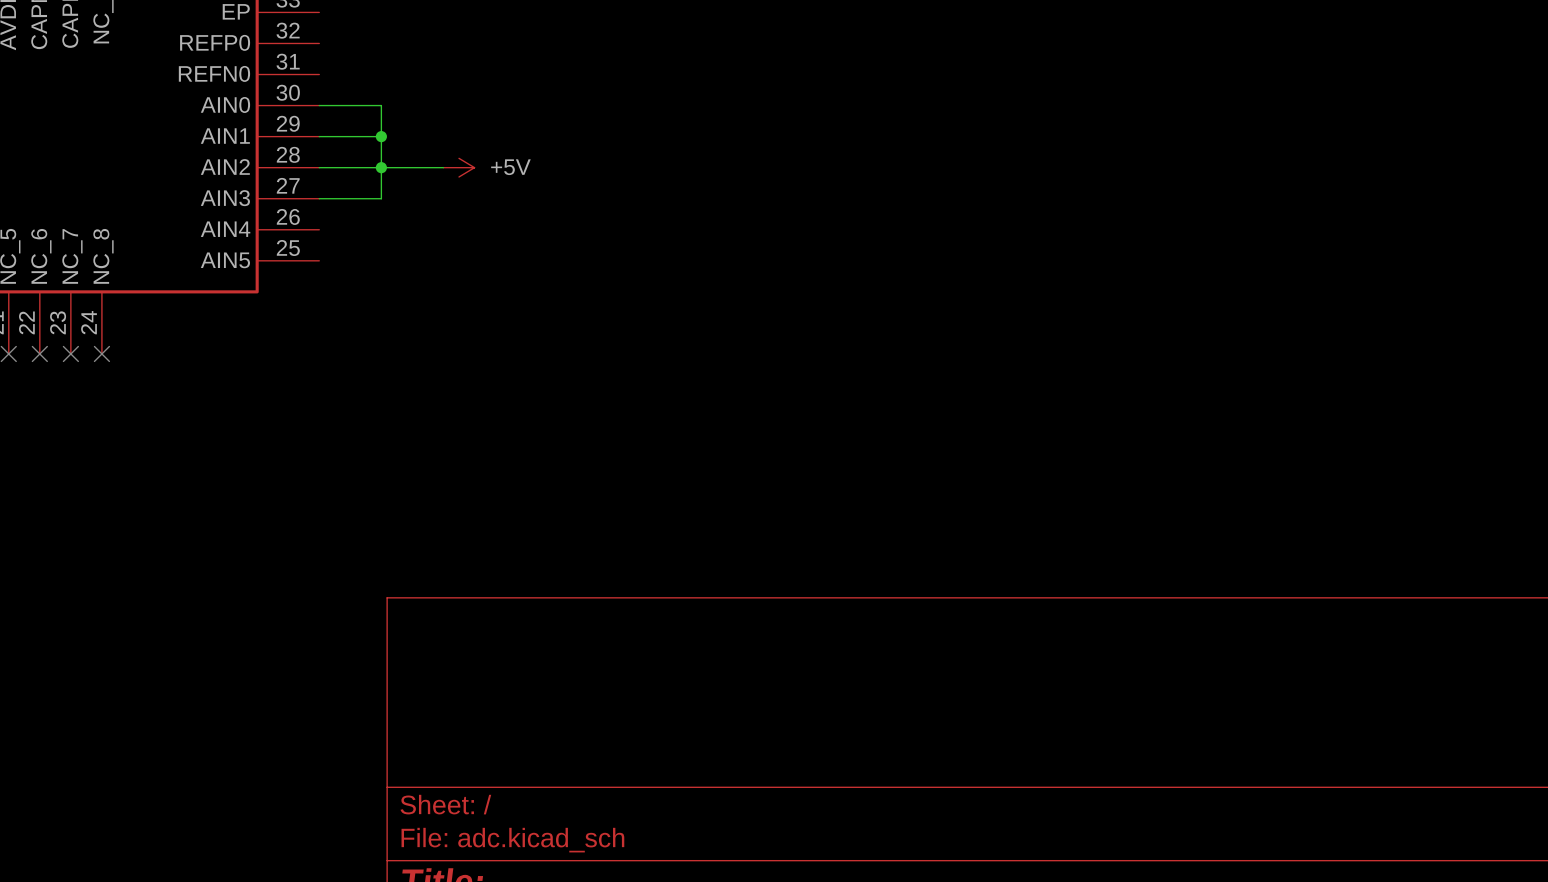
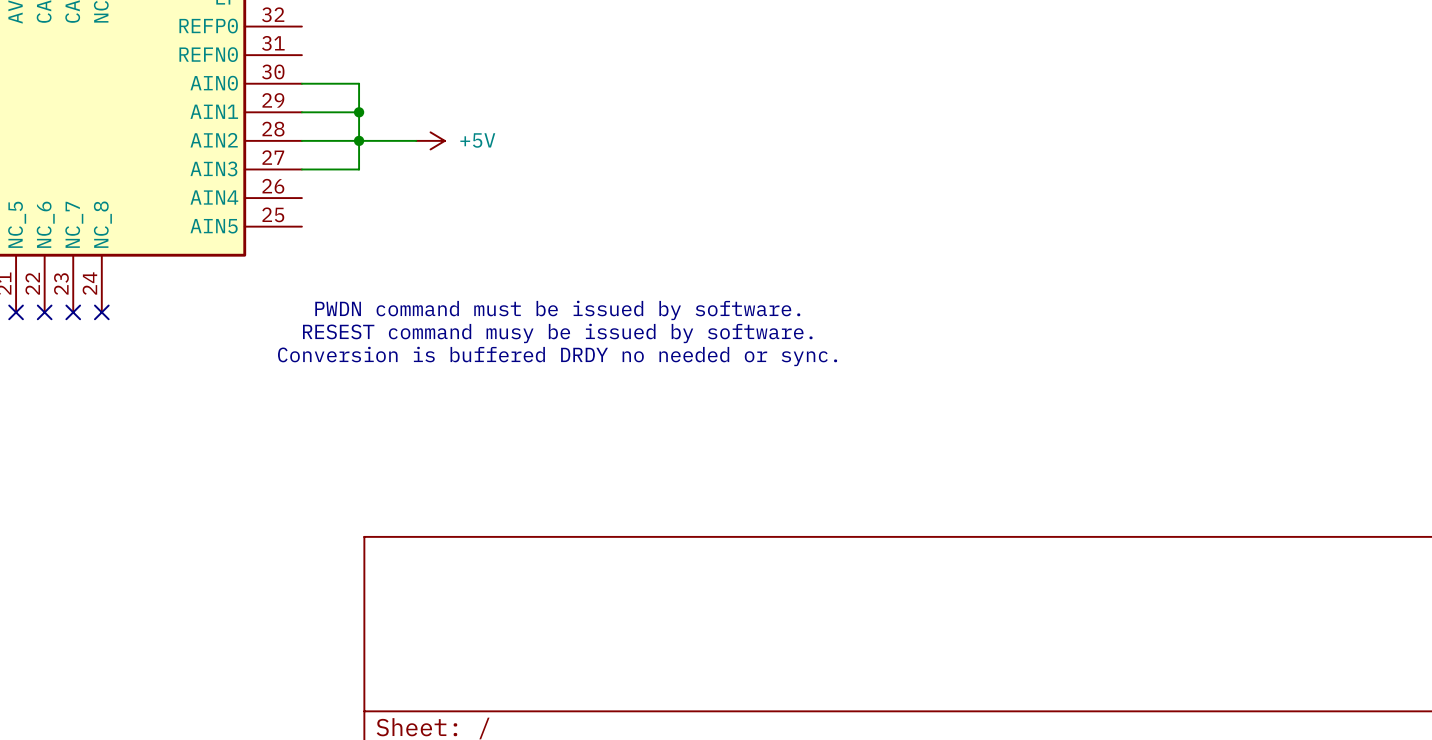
text: none -> PWDN command must be issued by software. (557, 310)
text: none -> RESEST command musy be issued by software. (557, 333)
text: none -> Conversion is buffered DRDY no needed or sync. (557, 356)

